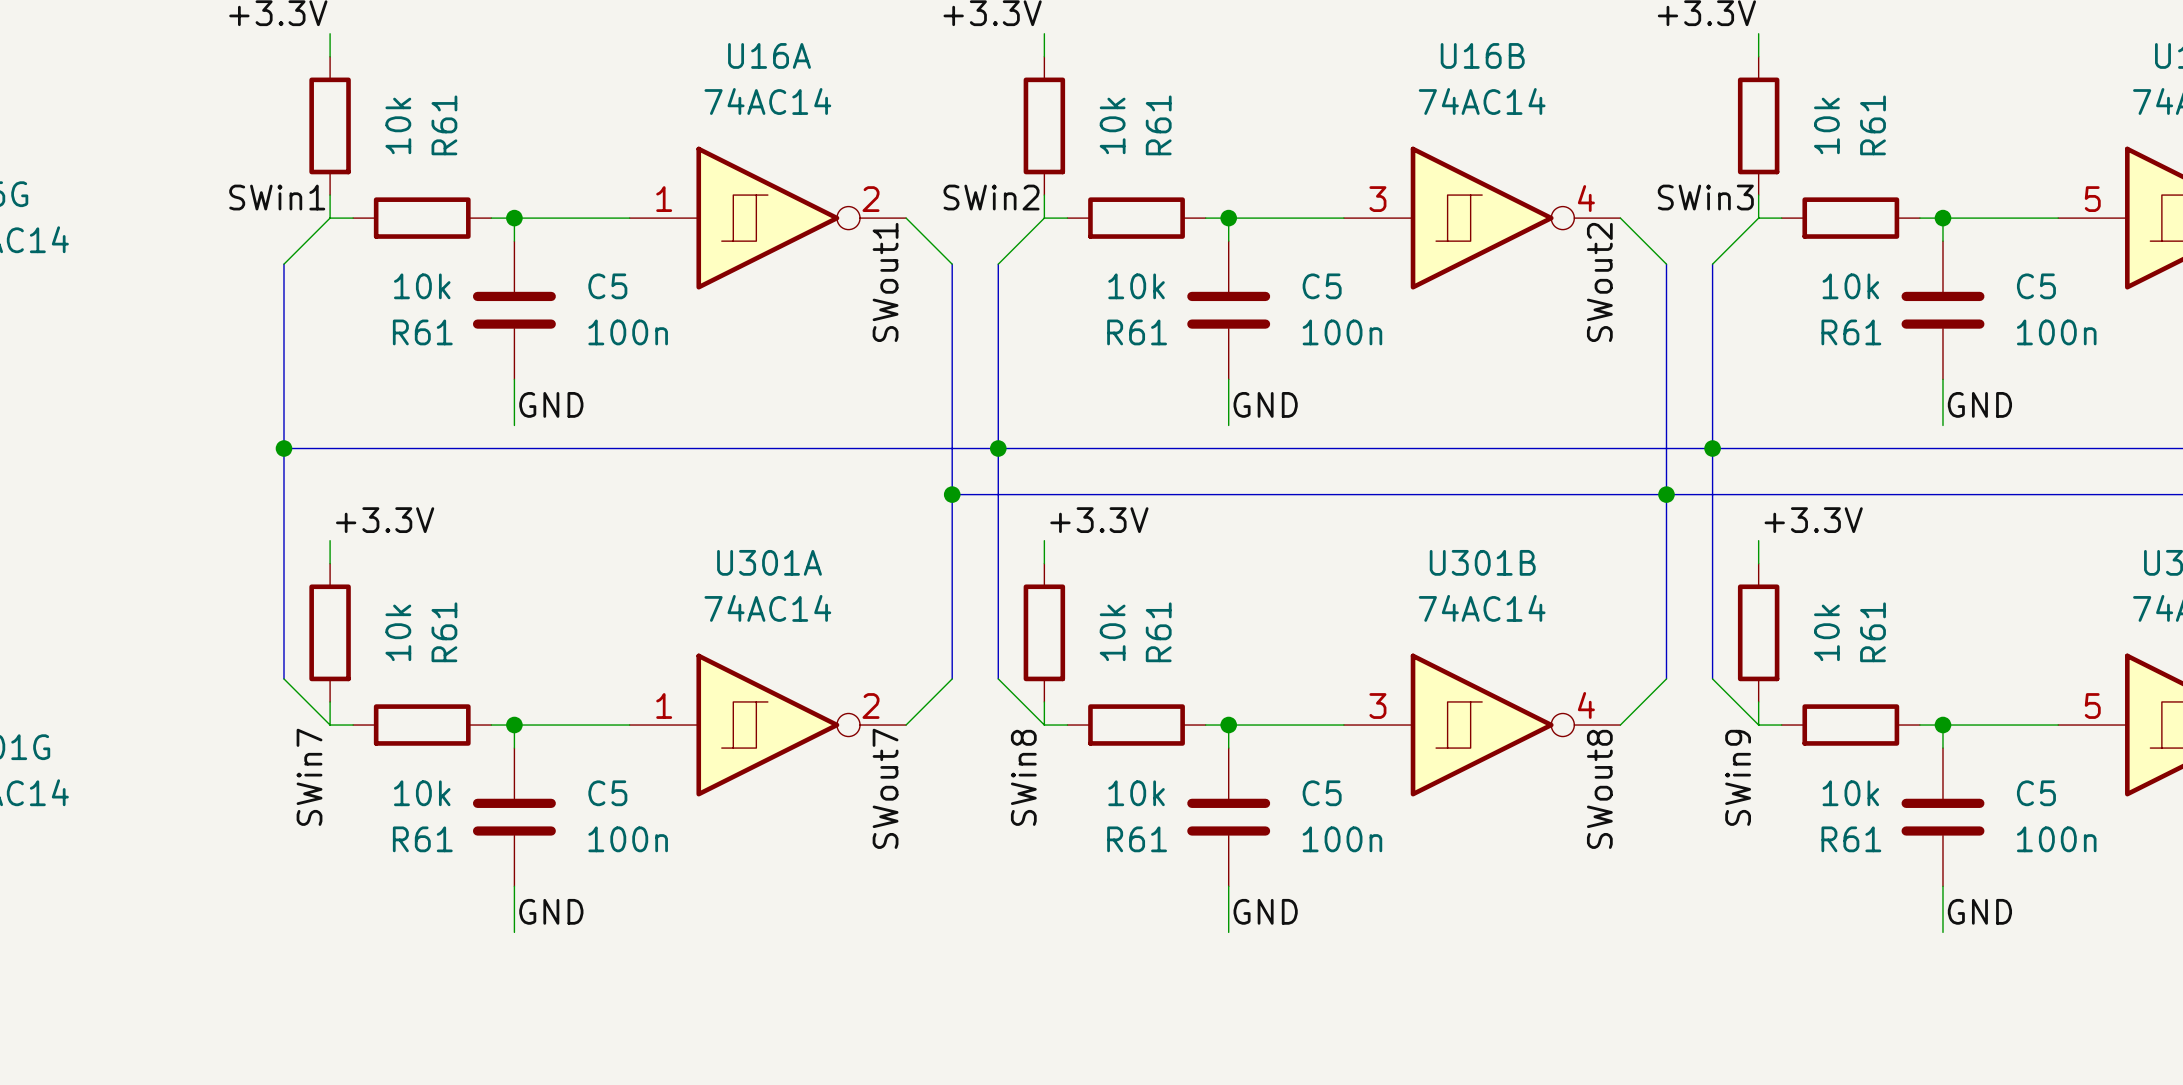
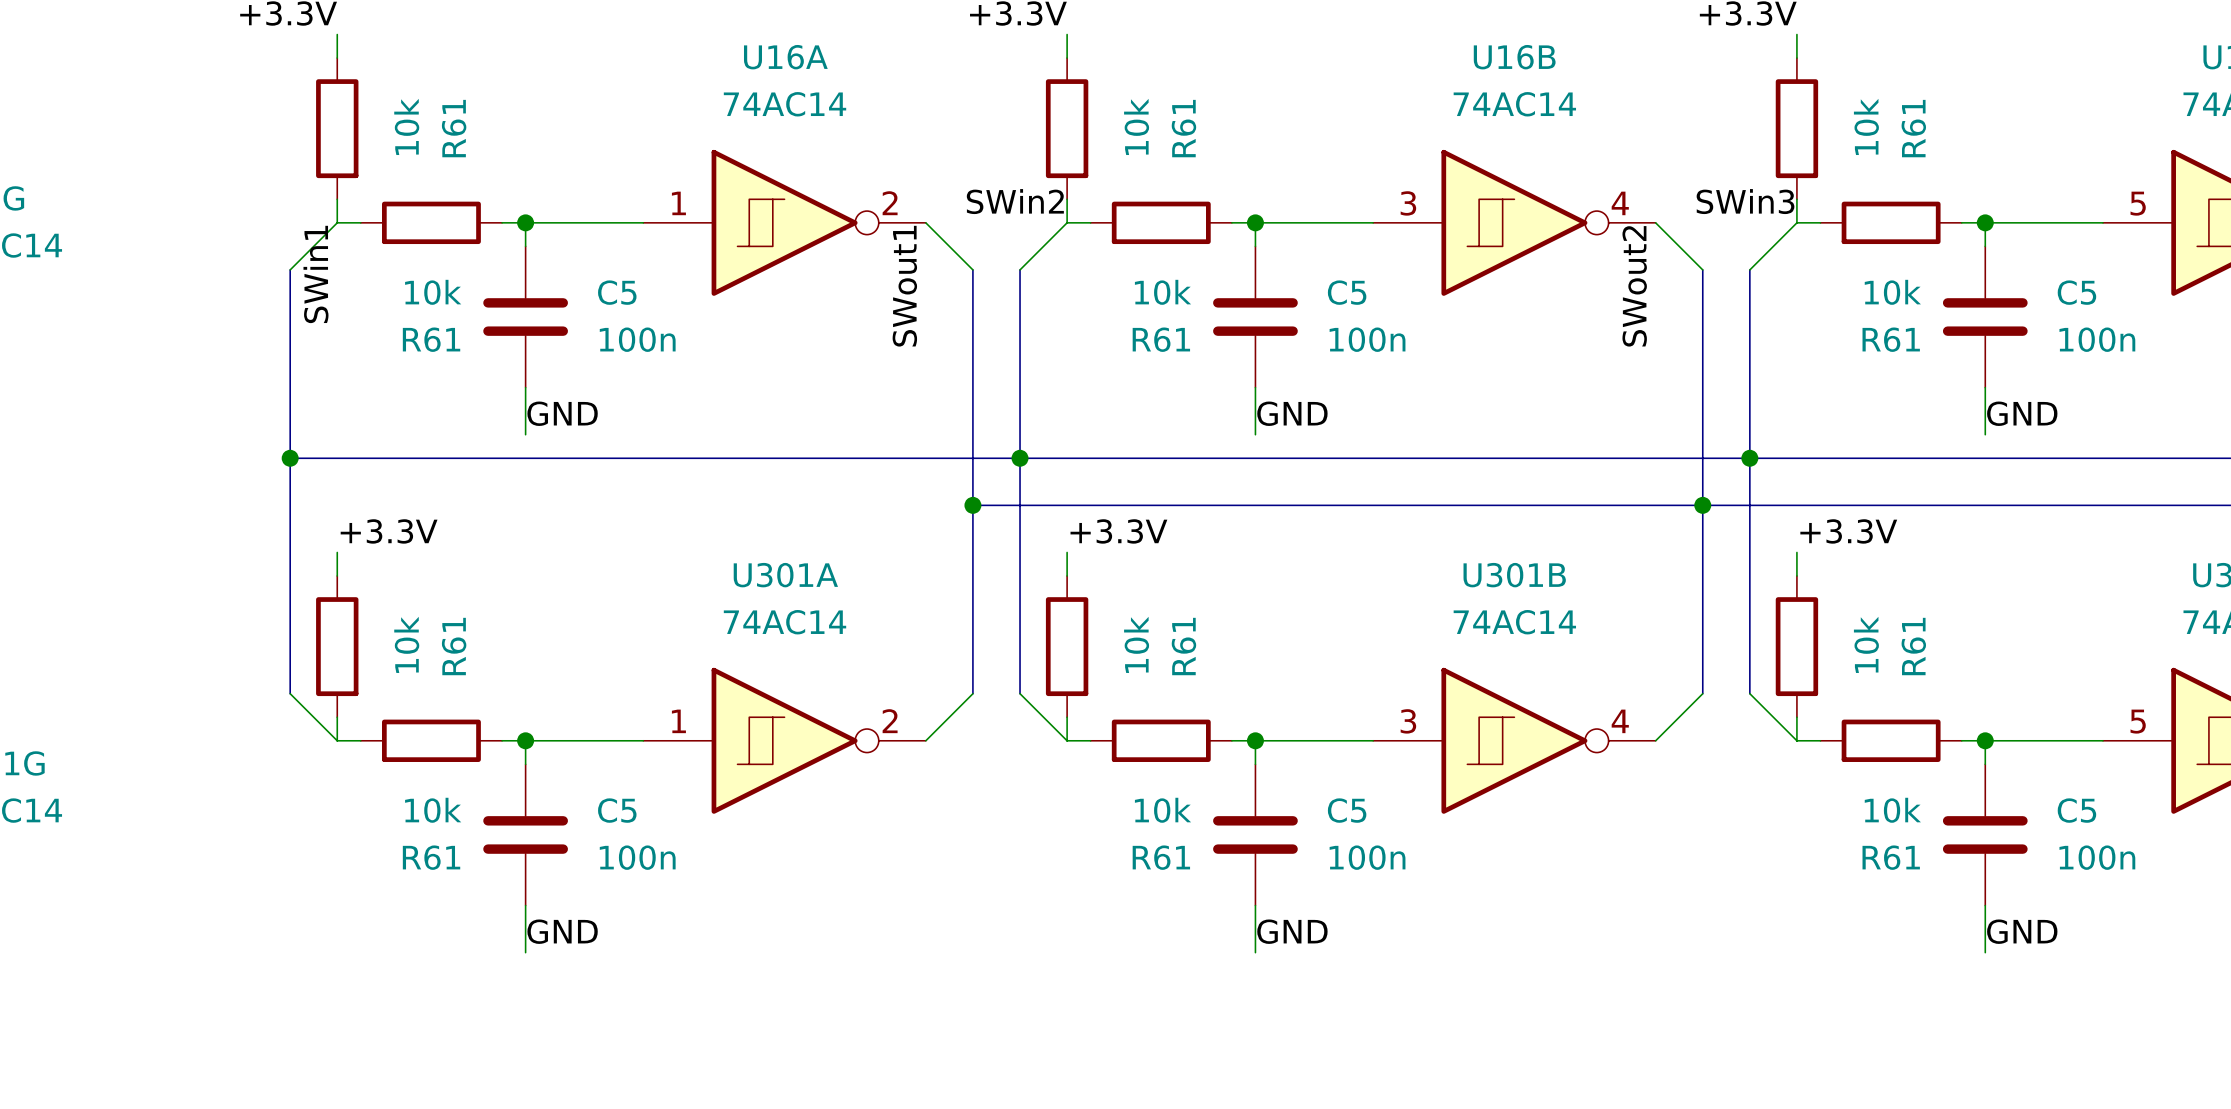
label rotation: 0° (277, 197) -> 90° counterclockwise (315, 274)
label: SWin7 (309, 777) -> none
label: SWin8 (1023, 777) -> none
label: SWin9 (1738, 777) -> none
label: SWout7 (885, 788) -> none
label: SWout8 (1599, 789) -> none

